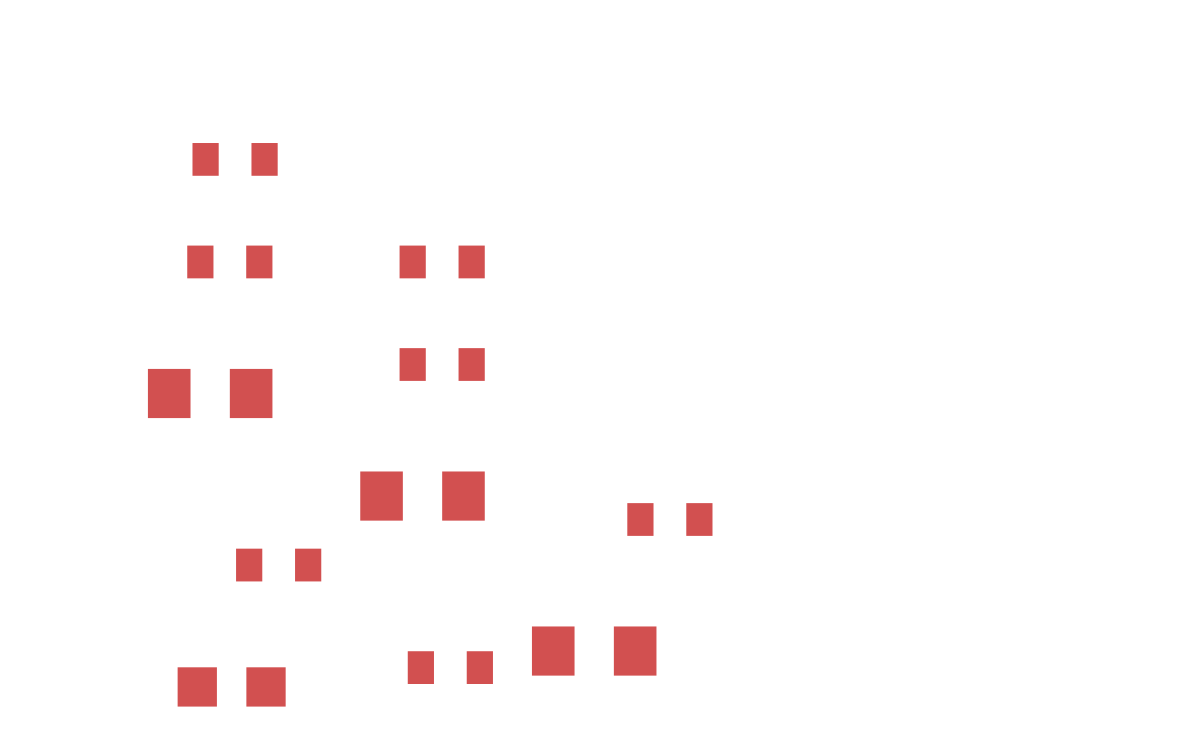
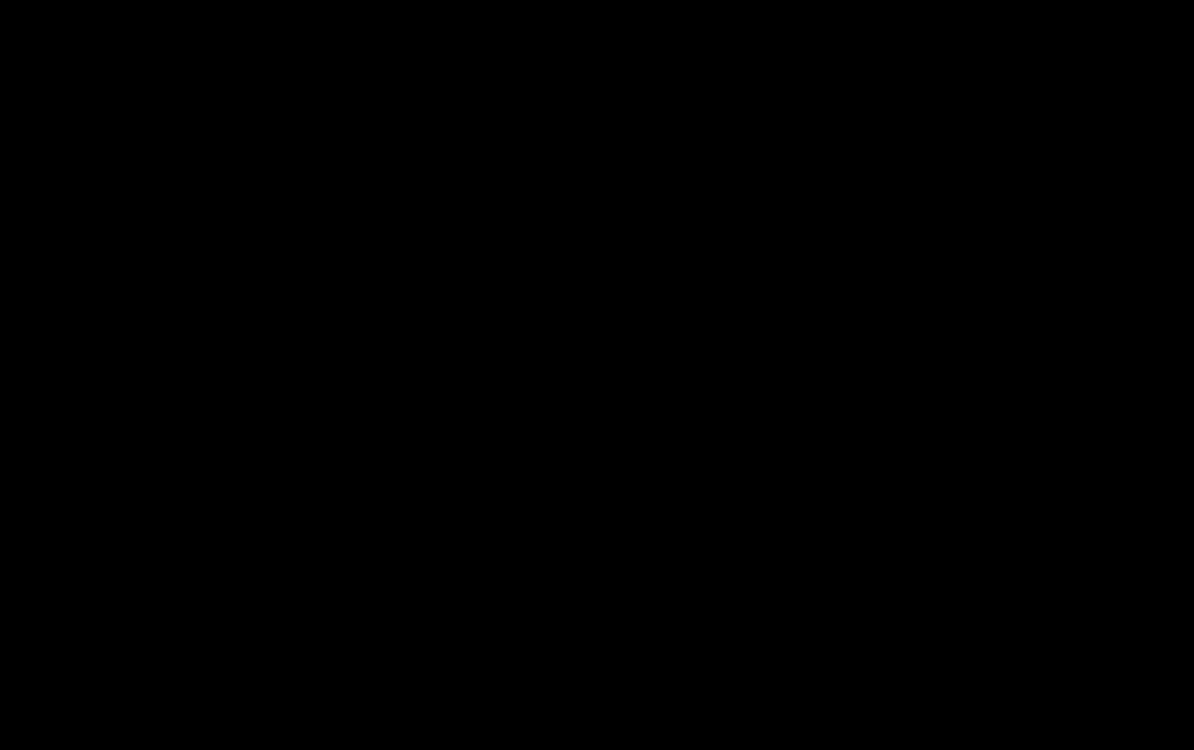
part: (235, 159) -> none
part: (229, 261) -> none
part: (442, 261) -> none
part: (442, 364) -> none
part: (210, 393) -> none
part: (422, 496) -> none
part: (669, 519) -> none
part: (278, 565) -> none
part: (594, 651) -> none
part: (450, 667) -> none
part: (231, 686) -> none

